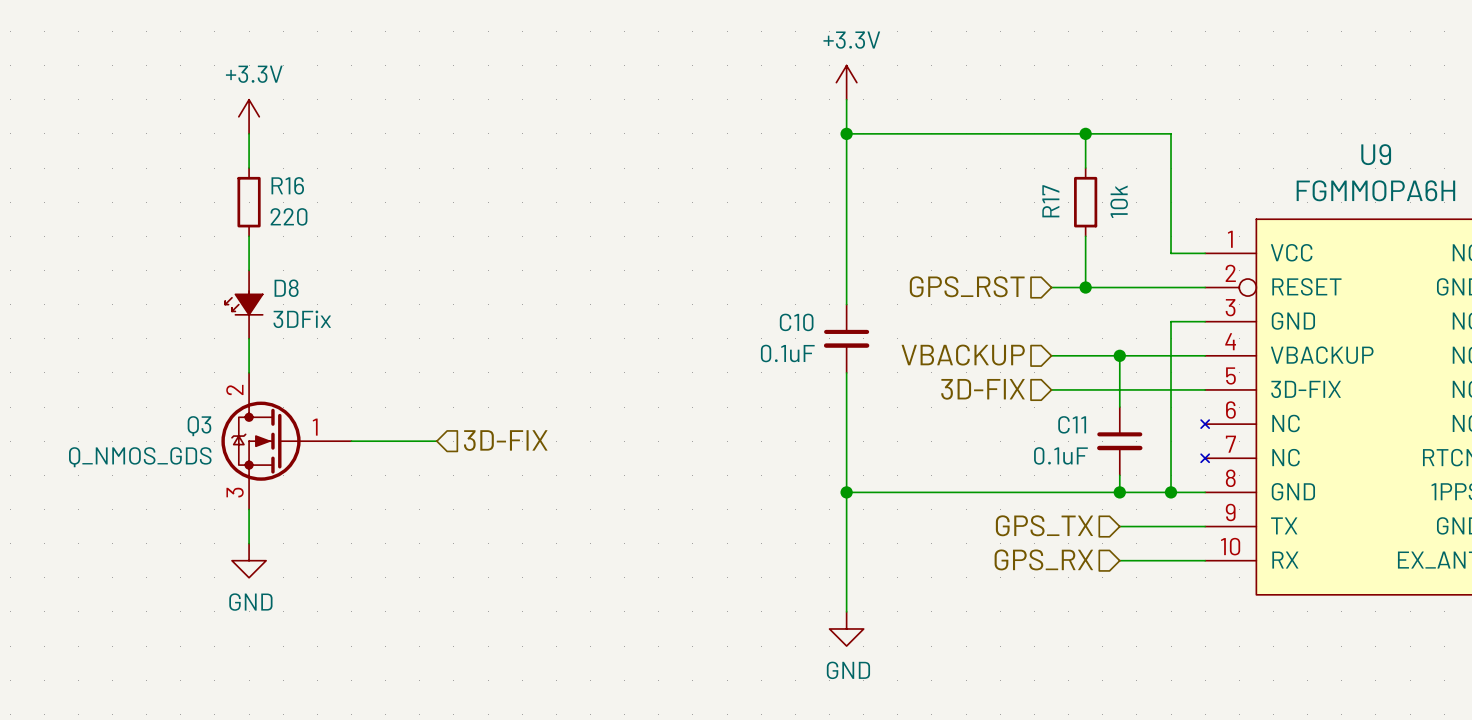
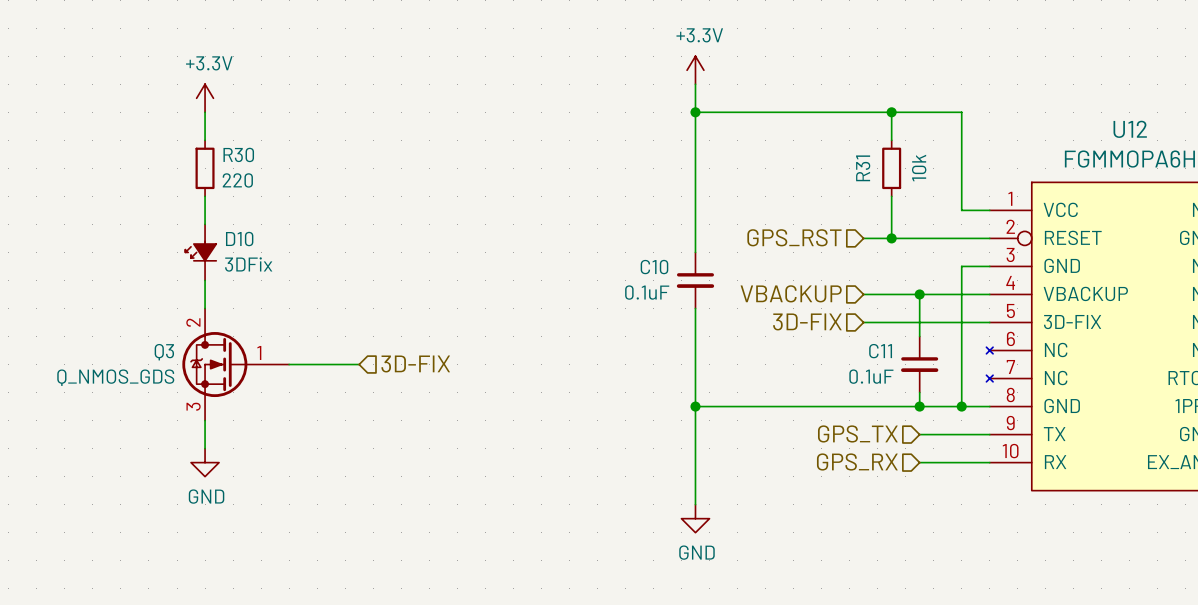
U9 name: U9 (1376, 154) -> U12 (1130, 129)
R16 name: R16 (287, 185) -> R30 (238, 154)
R17 name: R17 (1050, 201) -> R31 (863, 168)
D8 name: D8 (286, 288) -> D10 (239, 239)

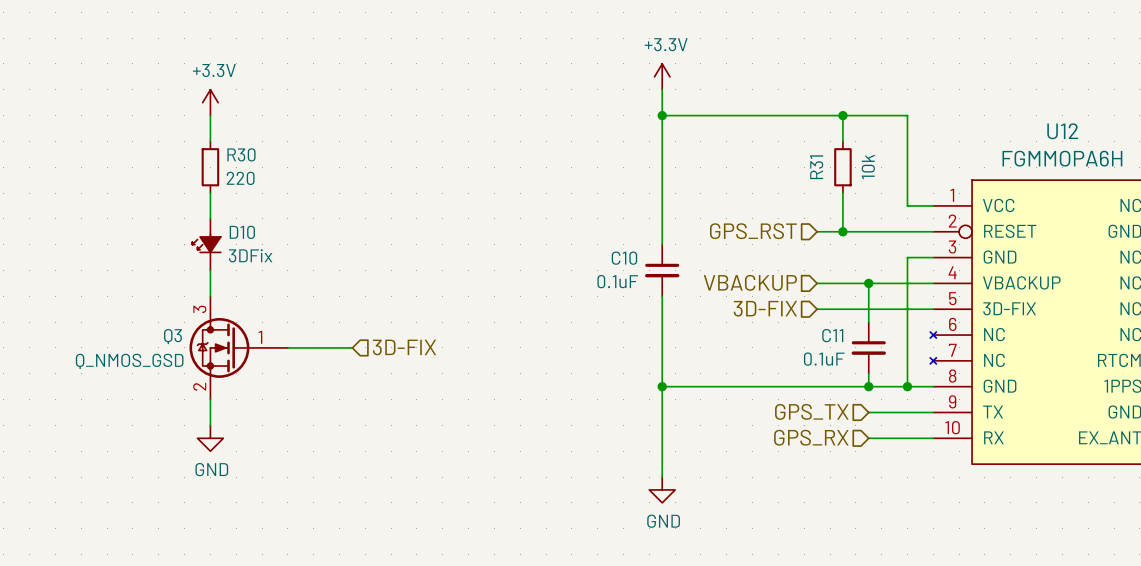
Q3 pin number: 2 (193, 322) -> 3 (199, 309)
Q3 value: Q_NMOS_GDS (115, 377) -> Q_NMOS_GSD (129, 361)
Q3 pin number: 3 (193, 406) -> 2 (199, 386)

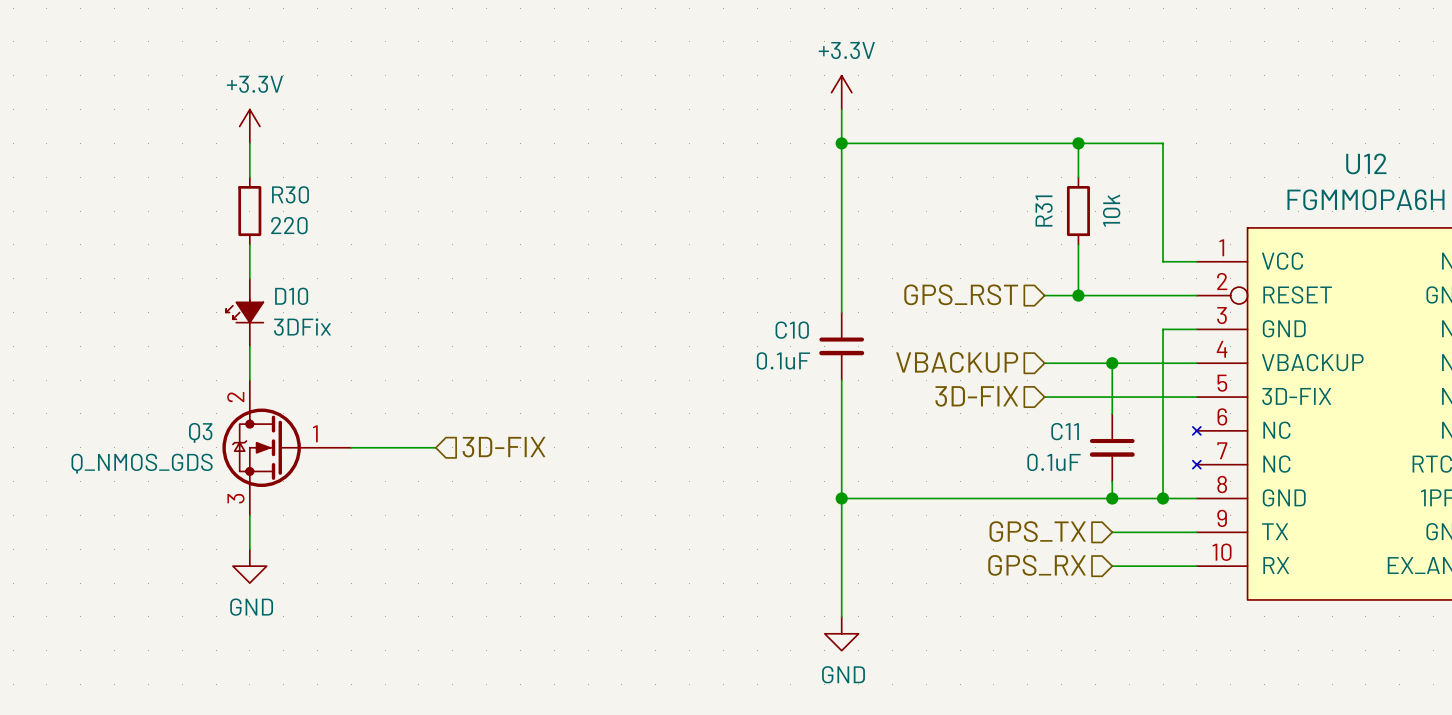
Q3 pin number: 3 (199, 309) -> 2 (235, 397)
Q3 value: Q_NMOS_GSD (129, 361) -> Q_NMOS_GDS (142, 463)
Q3 pin number: 2 (199, 386) -> 3 (235, 498)

